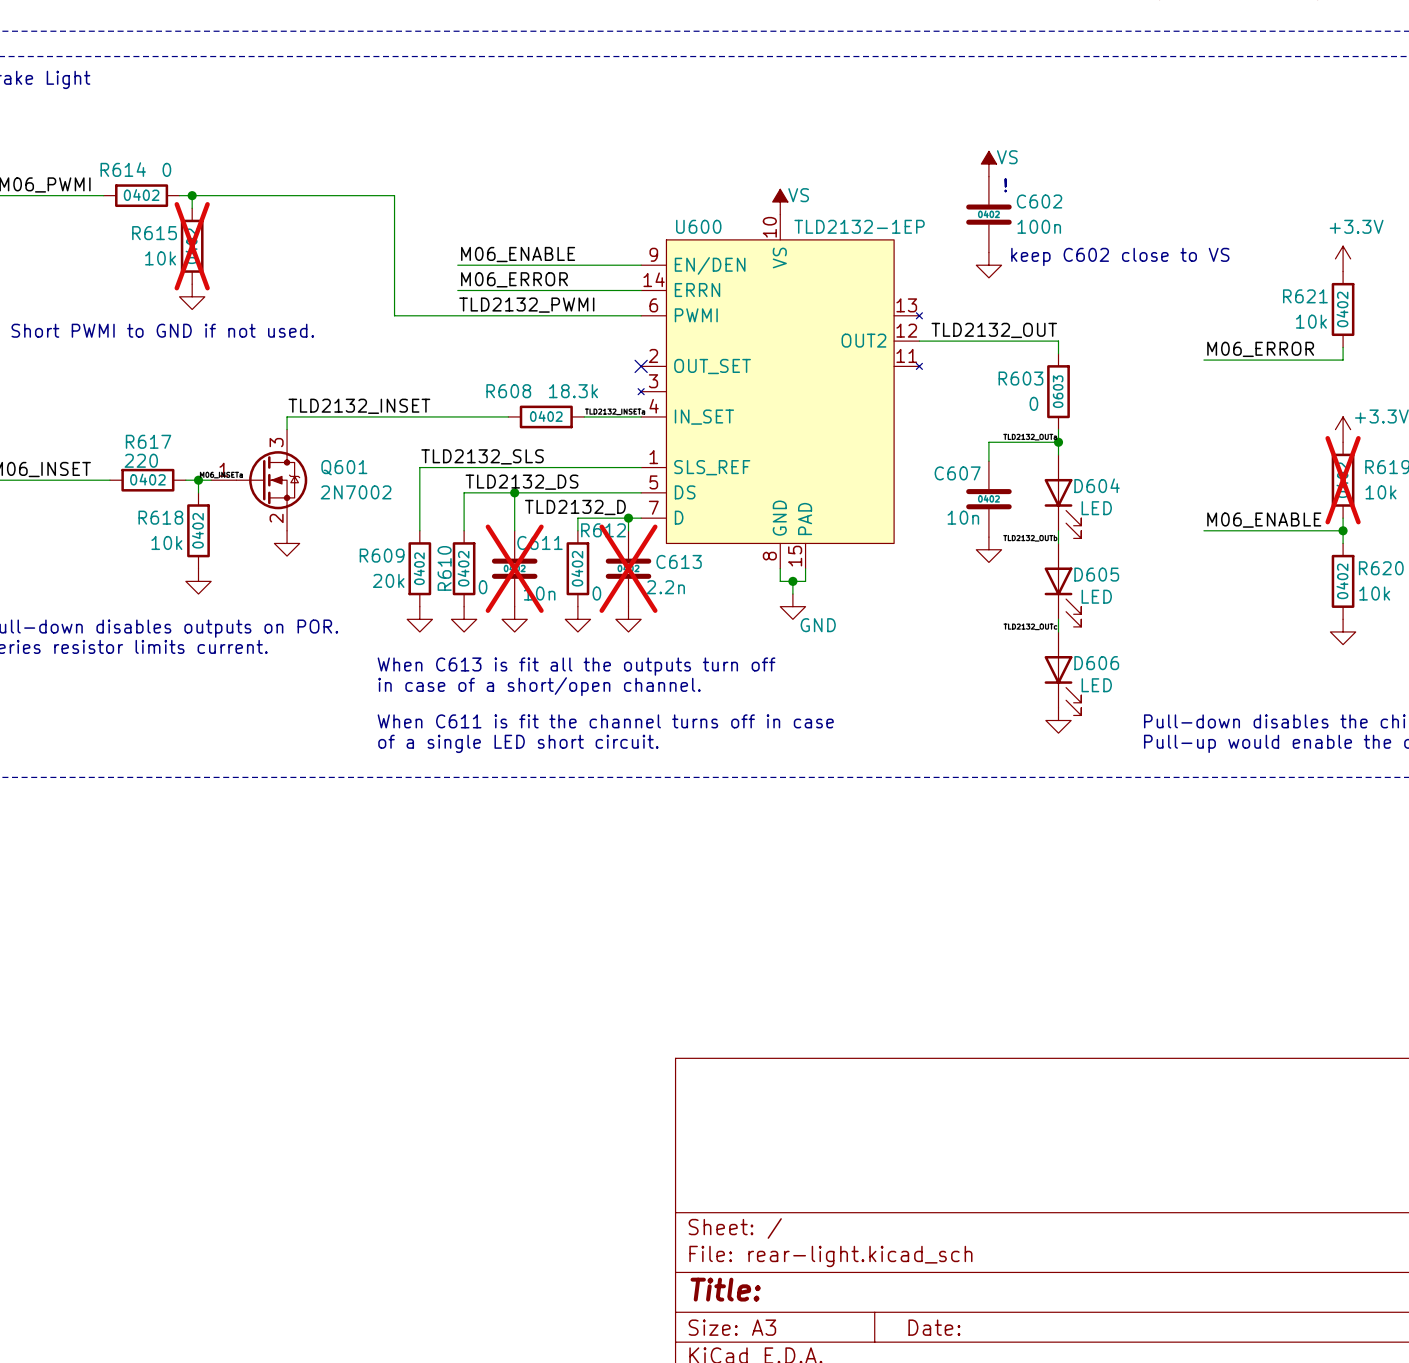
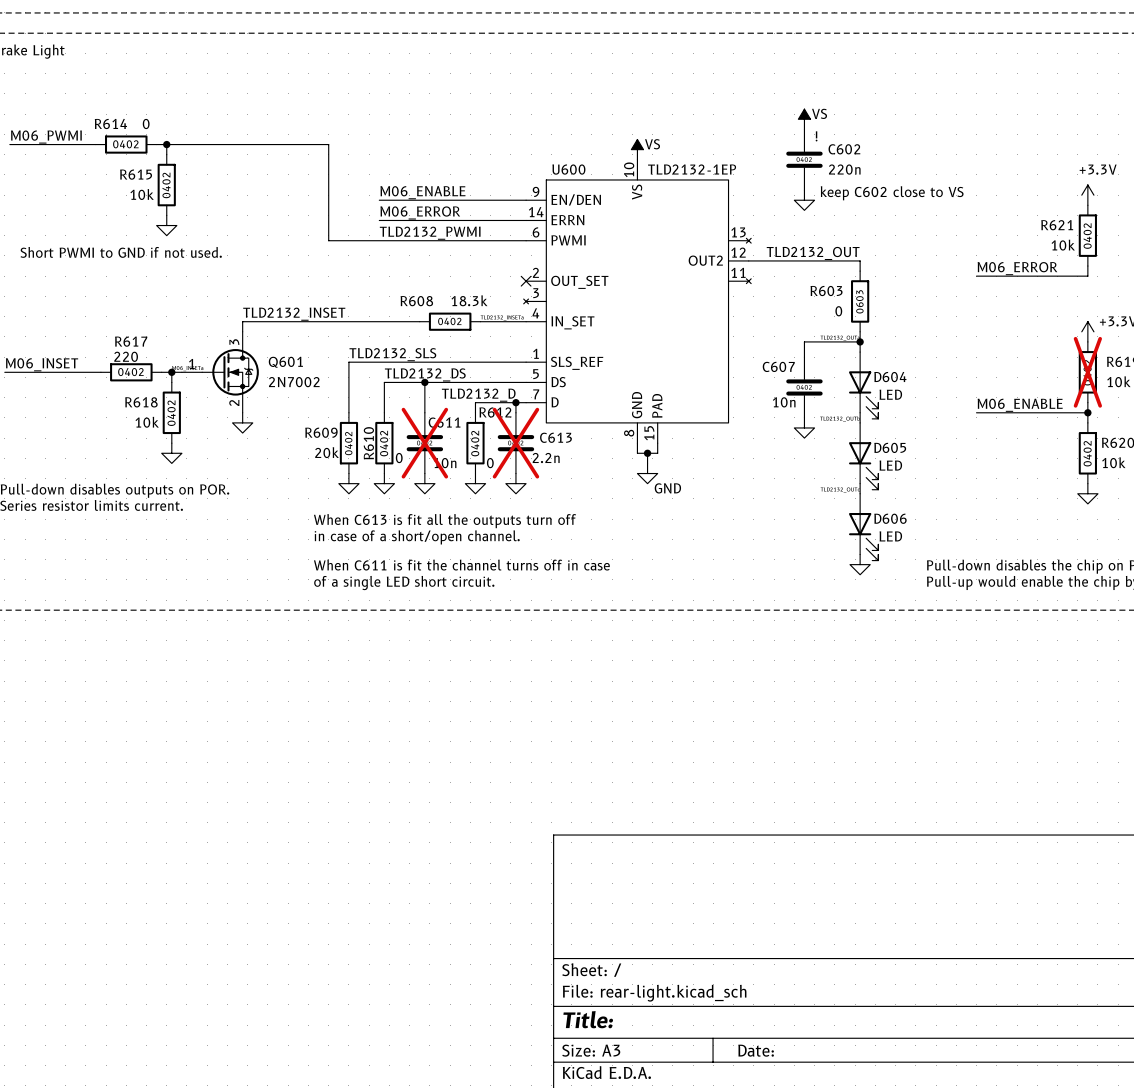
C602 value: 100n (1039, 226) -> 220n (844, 169)
R615 do-not-place cross: (192, 246) -> none

